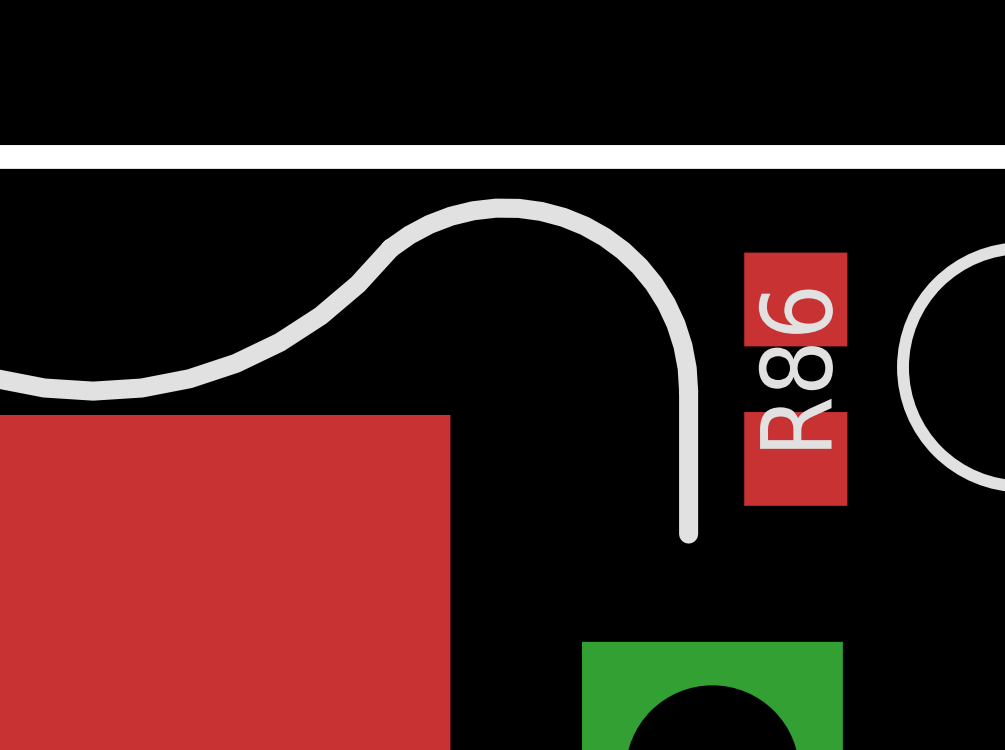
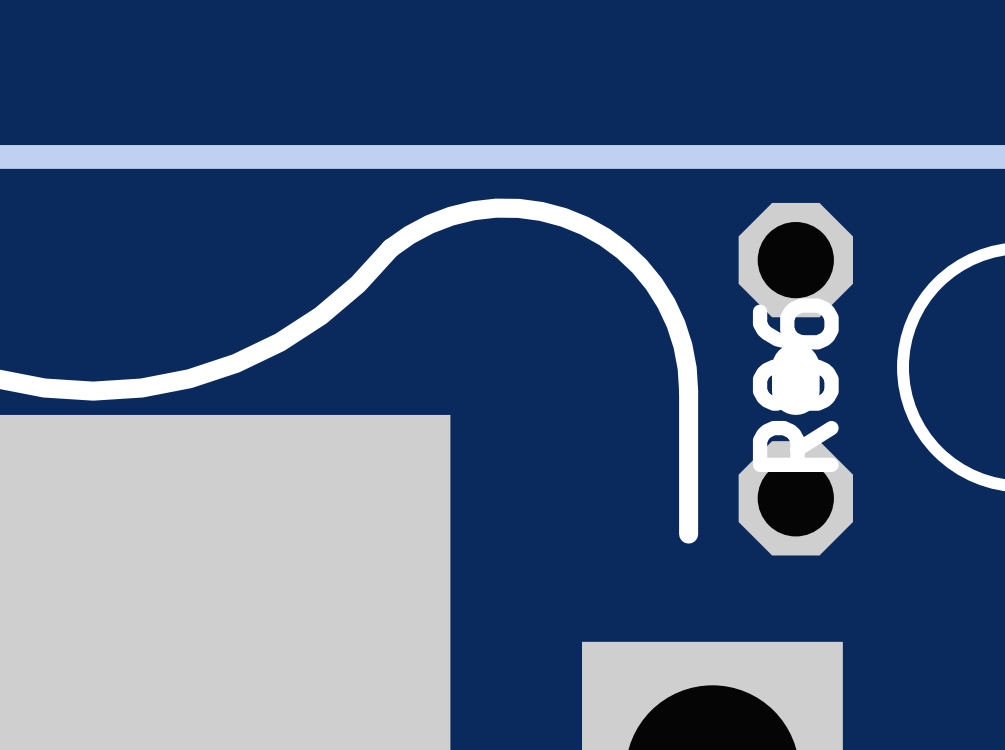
R86 footprint: [744, 252, 848, 506] -> [738, 202, 853, 556]

